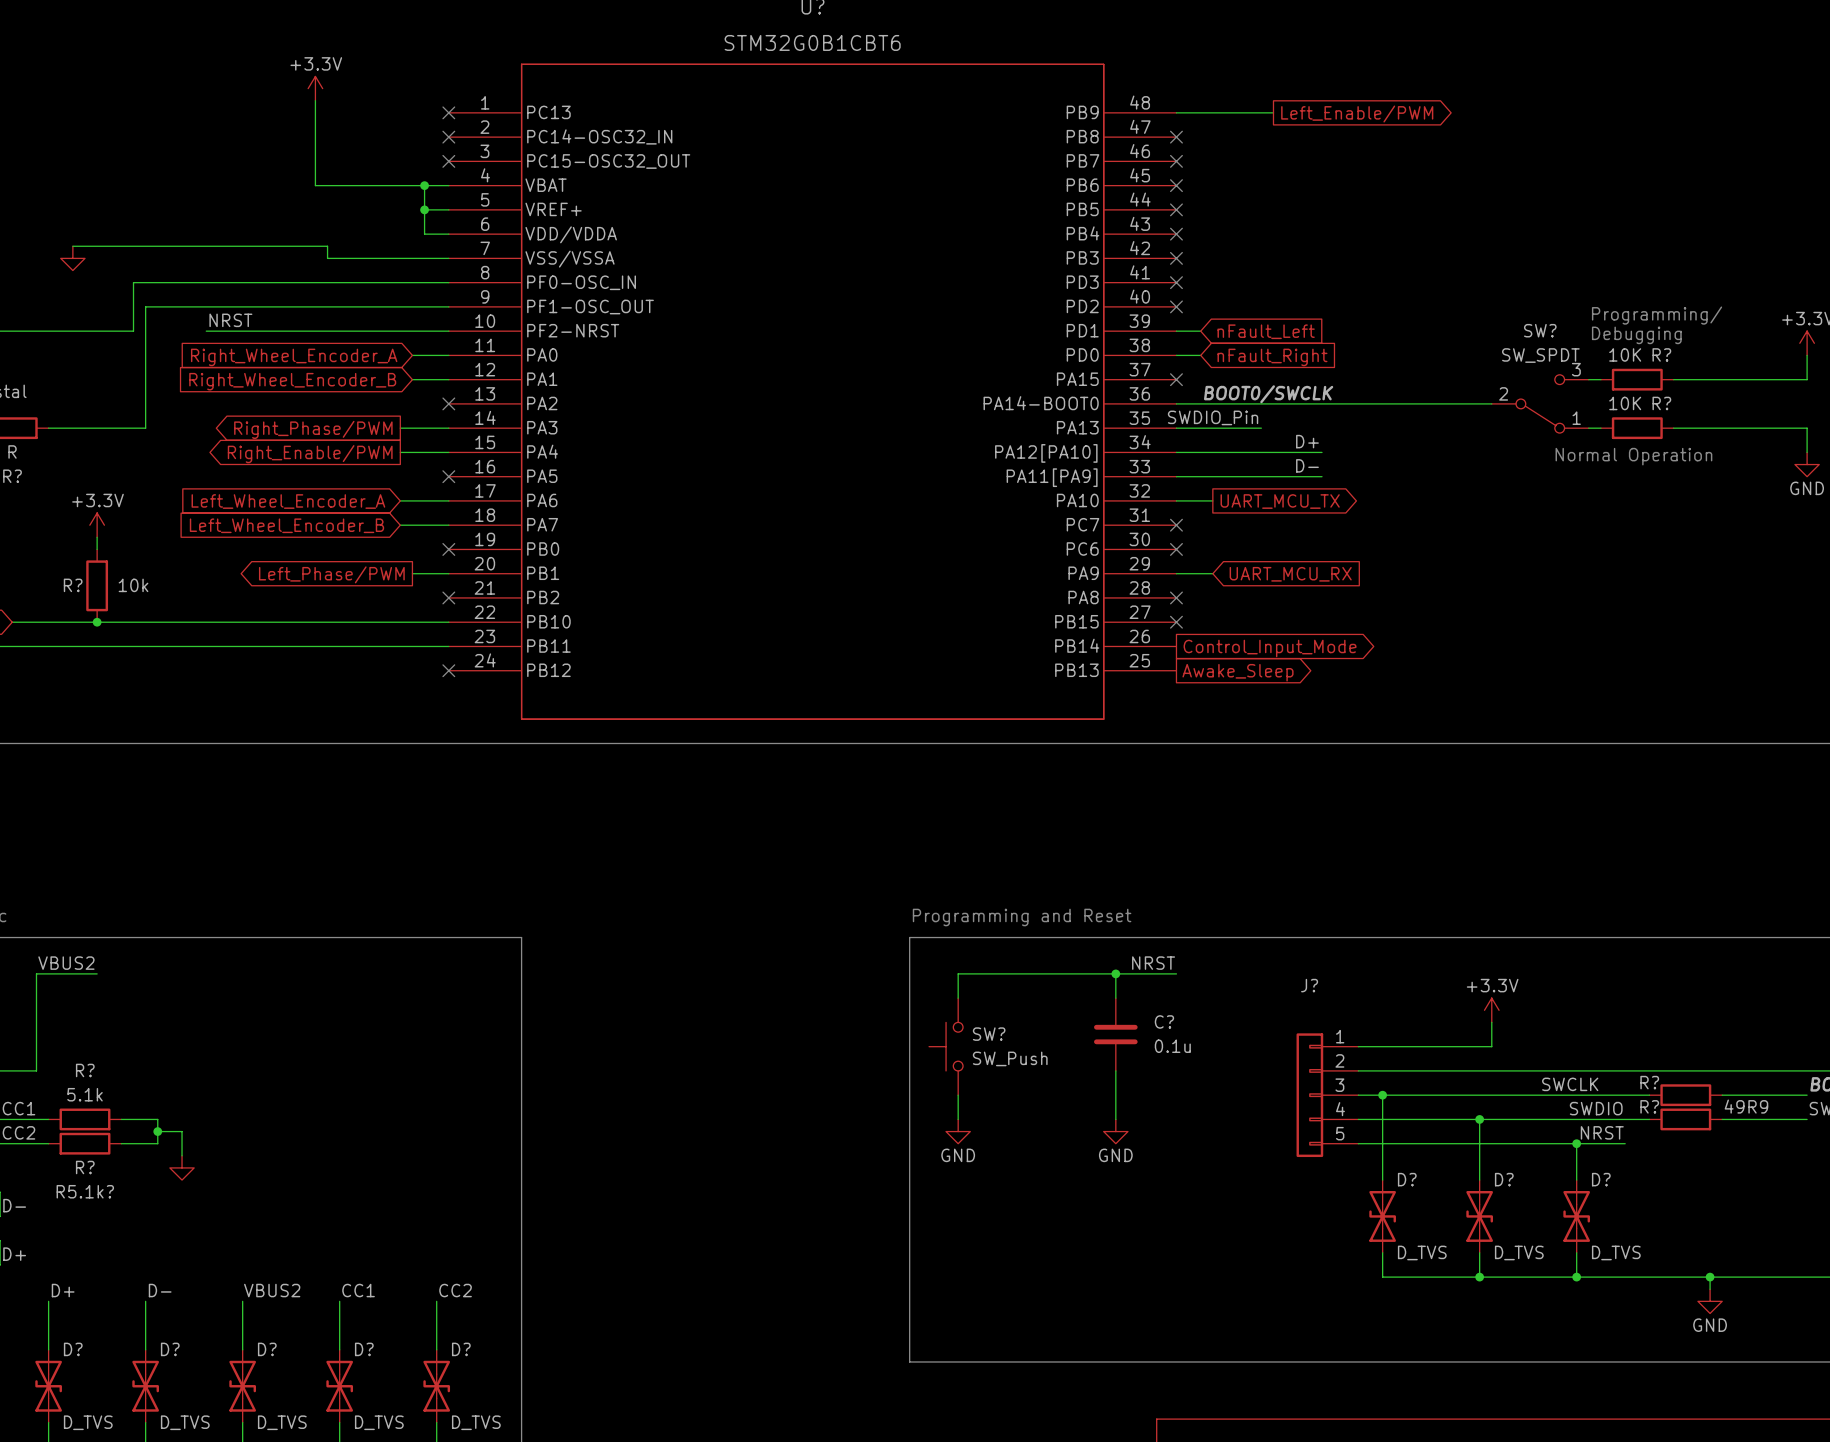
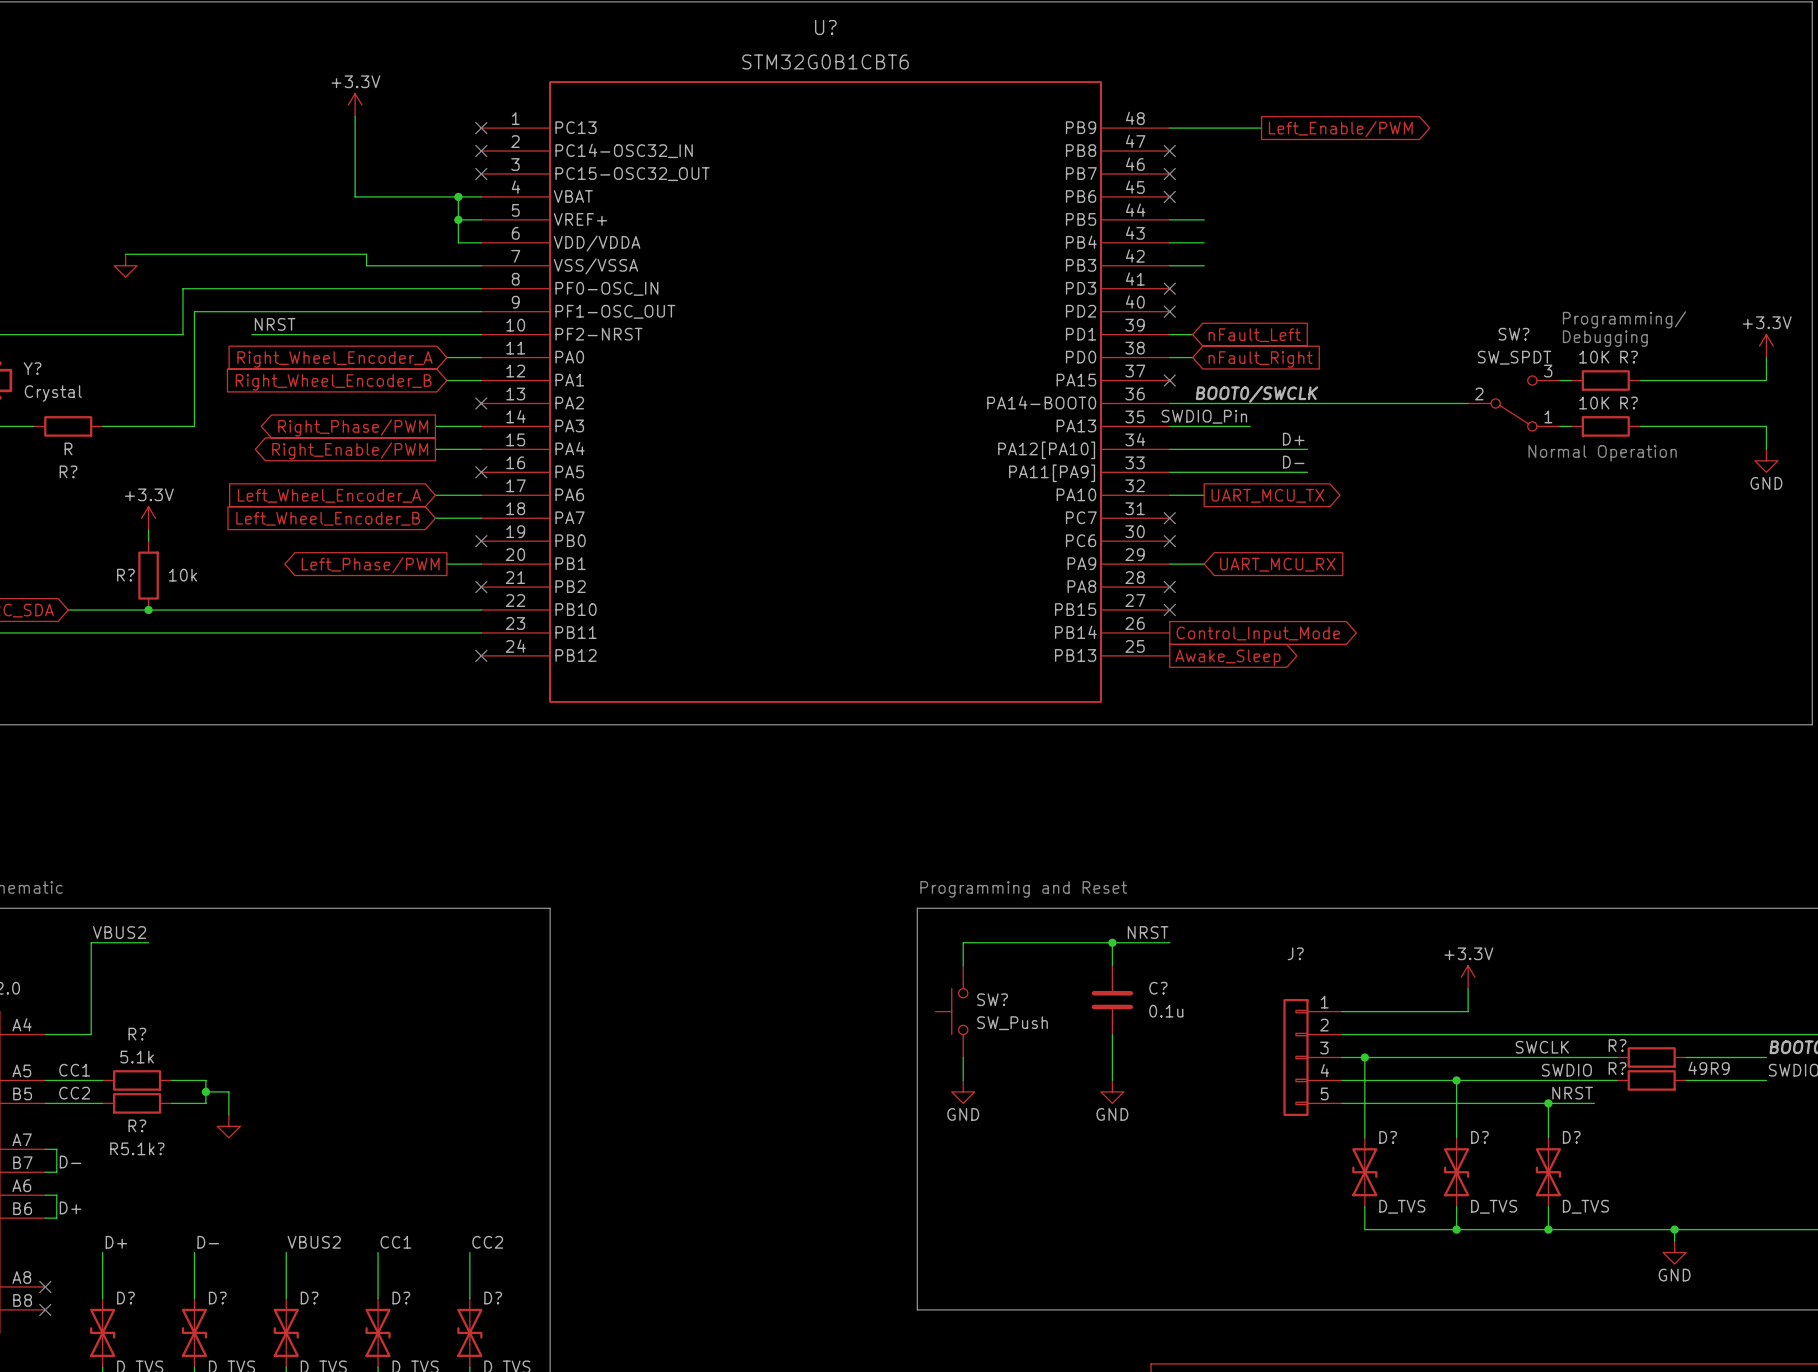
wire: none -> (1169, 219) (1204, 219)
no-connect mark: (1176, 209) -> none
wire: none -> (1169, 242) (1204, 242)
no-connect mark: (1176, 234) -> none
wire: none -> (1169, 265) (1204, 265)
no-connect mark: (1176, 258) -> none

